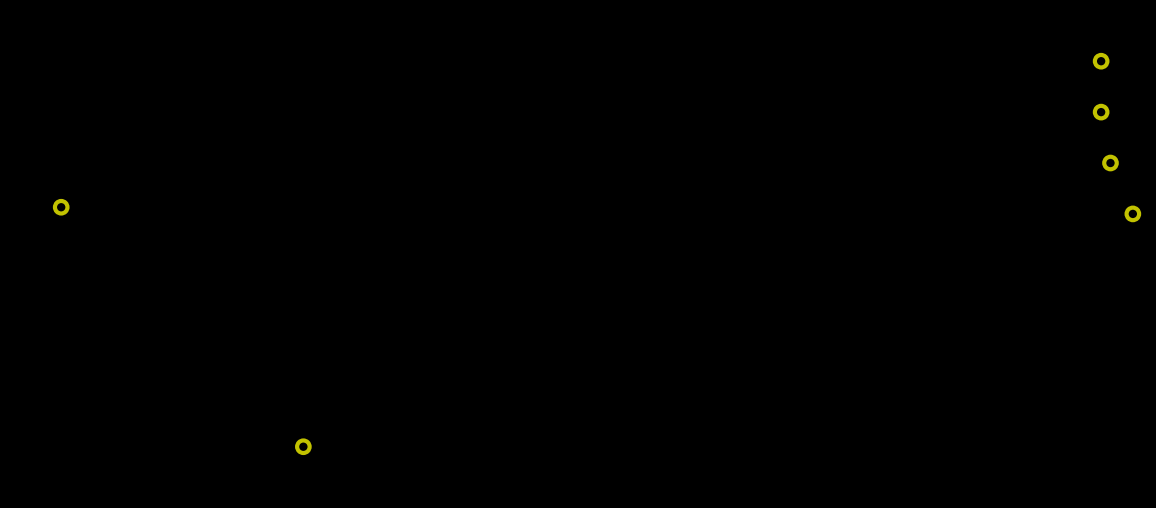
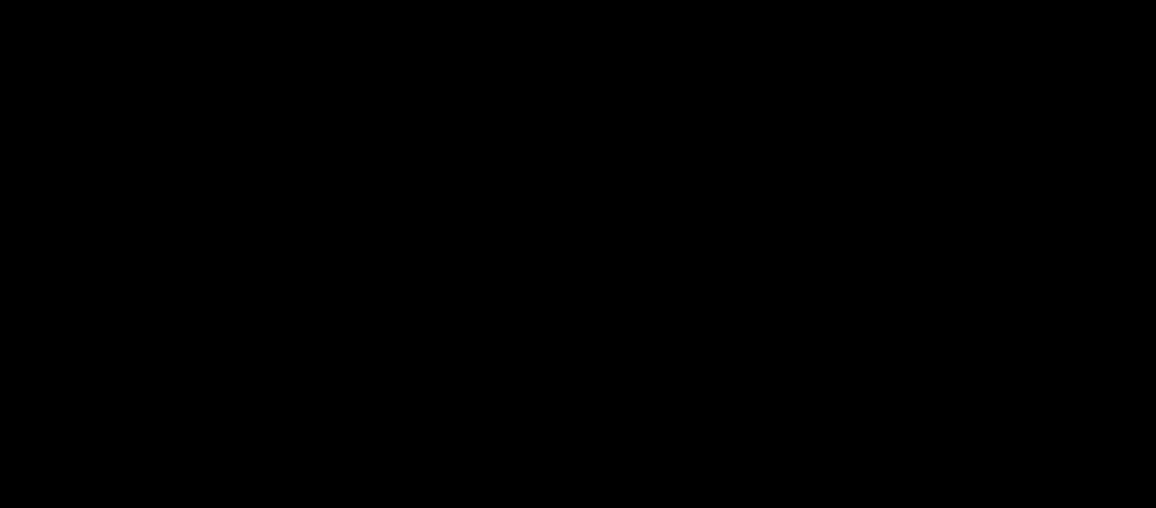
part: (1101, 61) -> none
part: (1101, 112) -> none
part: (1110, 163) -> none
part: (61, 207) -> none
part: (1132, 213) -> none
part: (303, 446) -> none

